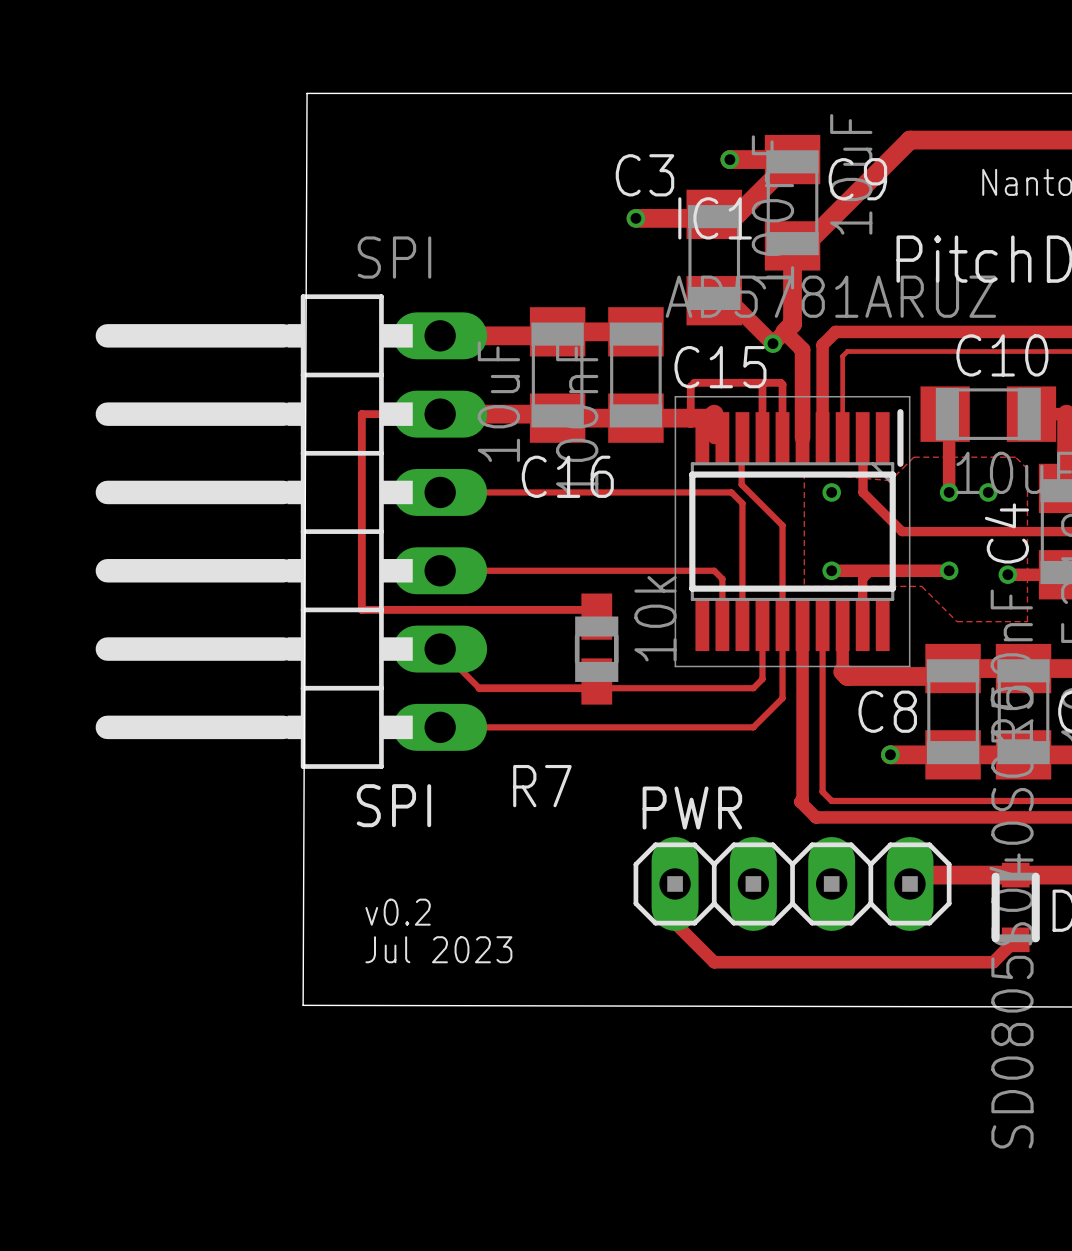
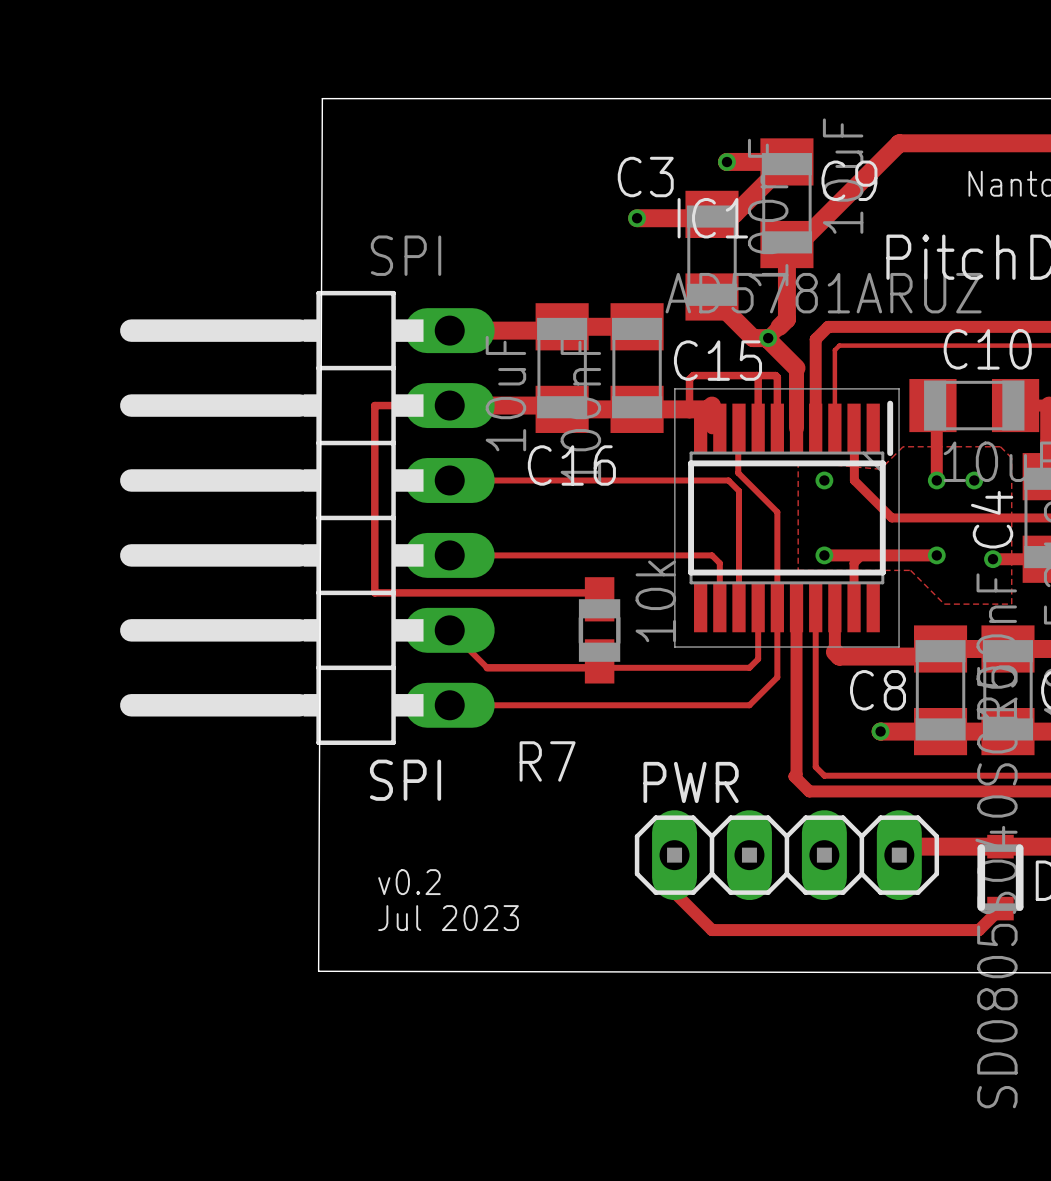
track: (729, 300) (772, 343) -> none
track: (784, 331) (802, 349) (802, 374) -> (712, 296) (753, 338) (768, 338) (796, 368)

